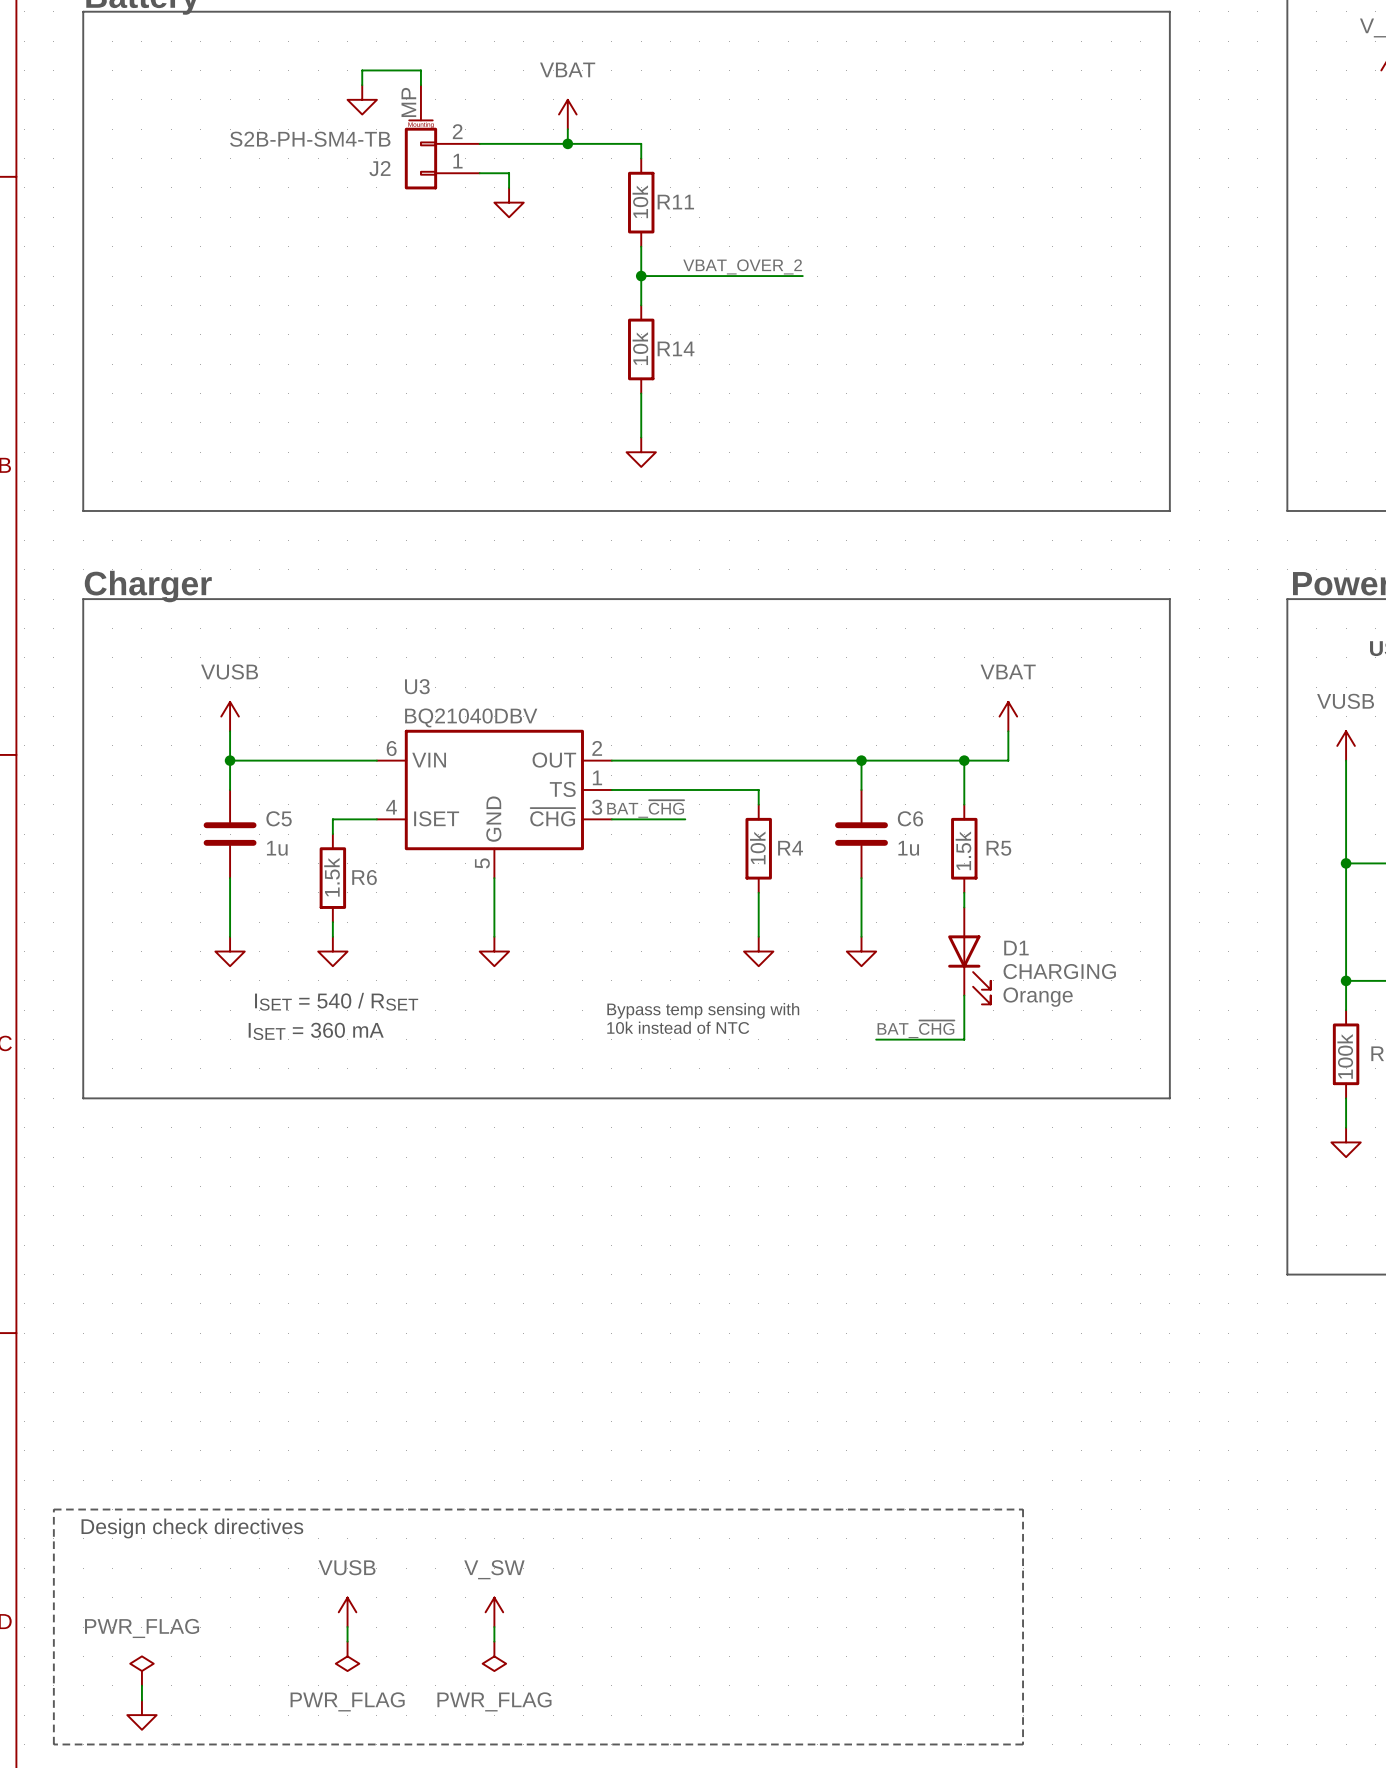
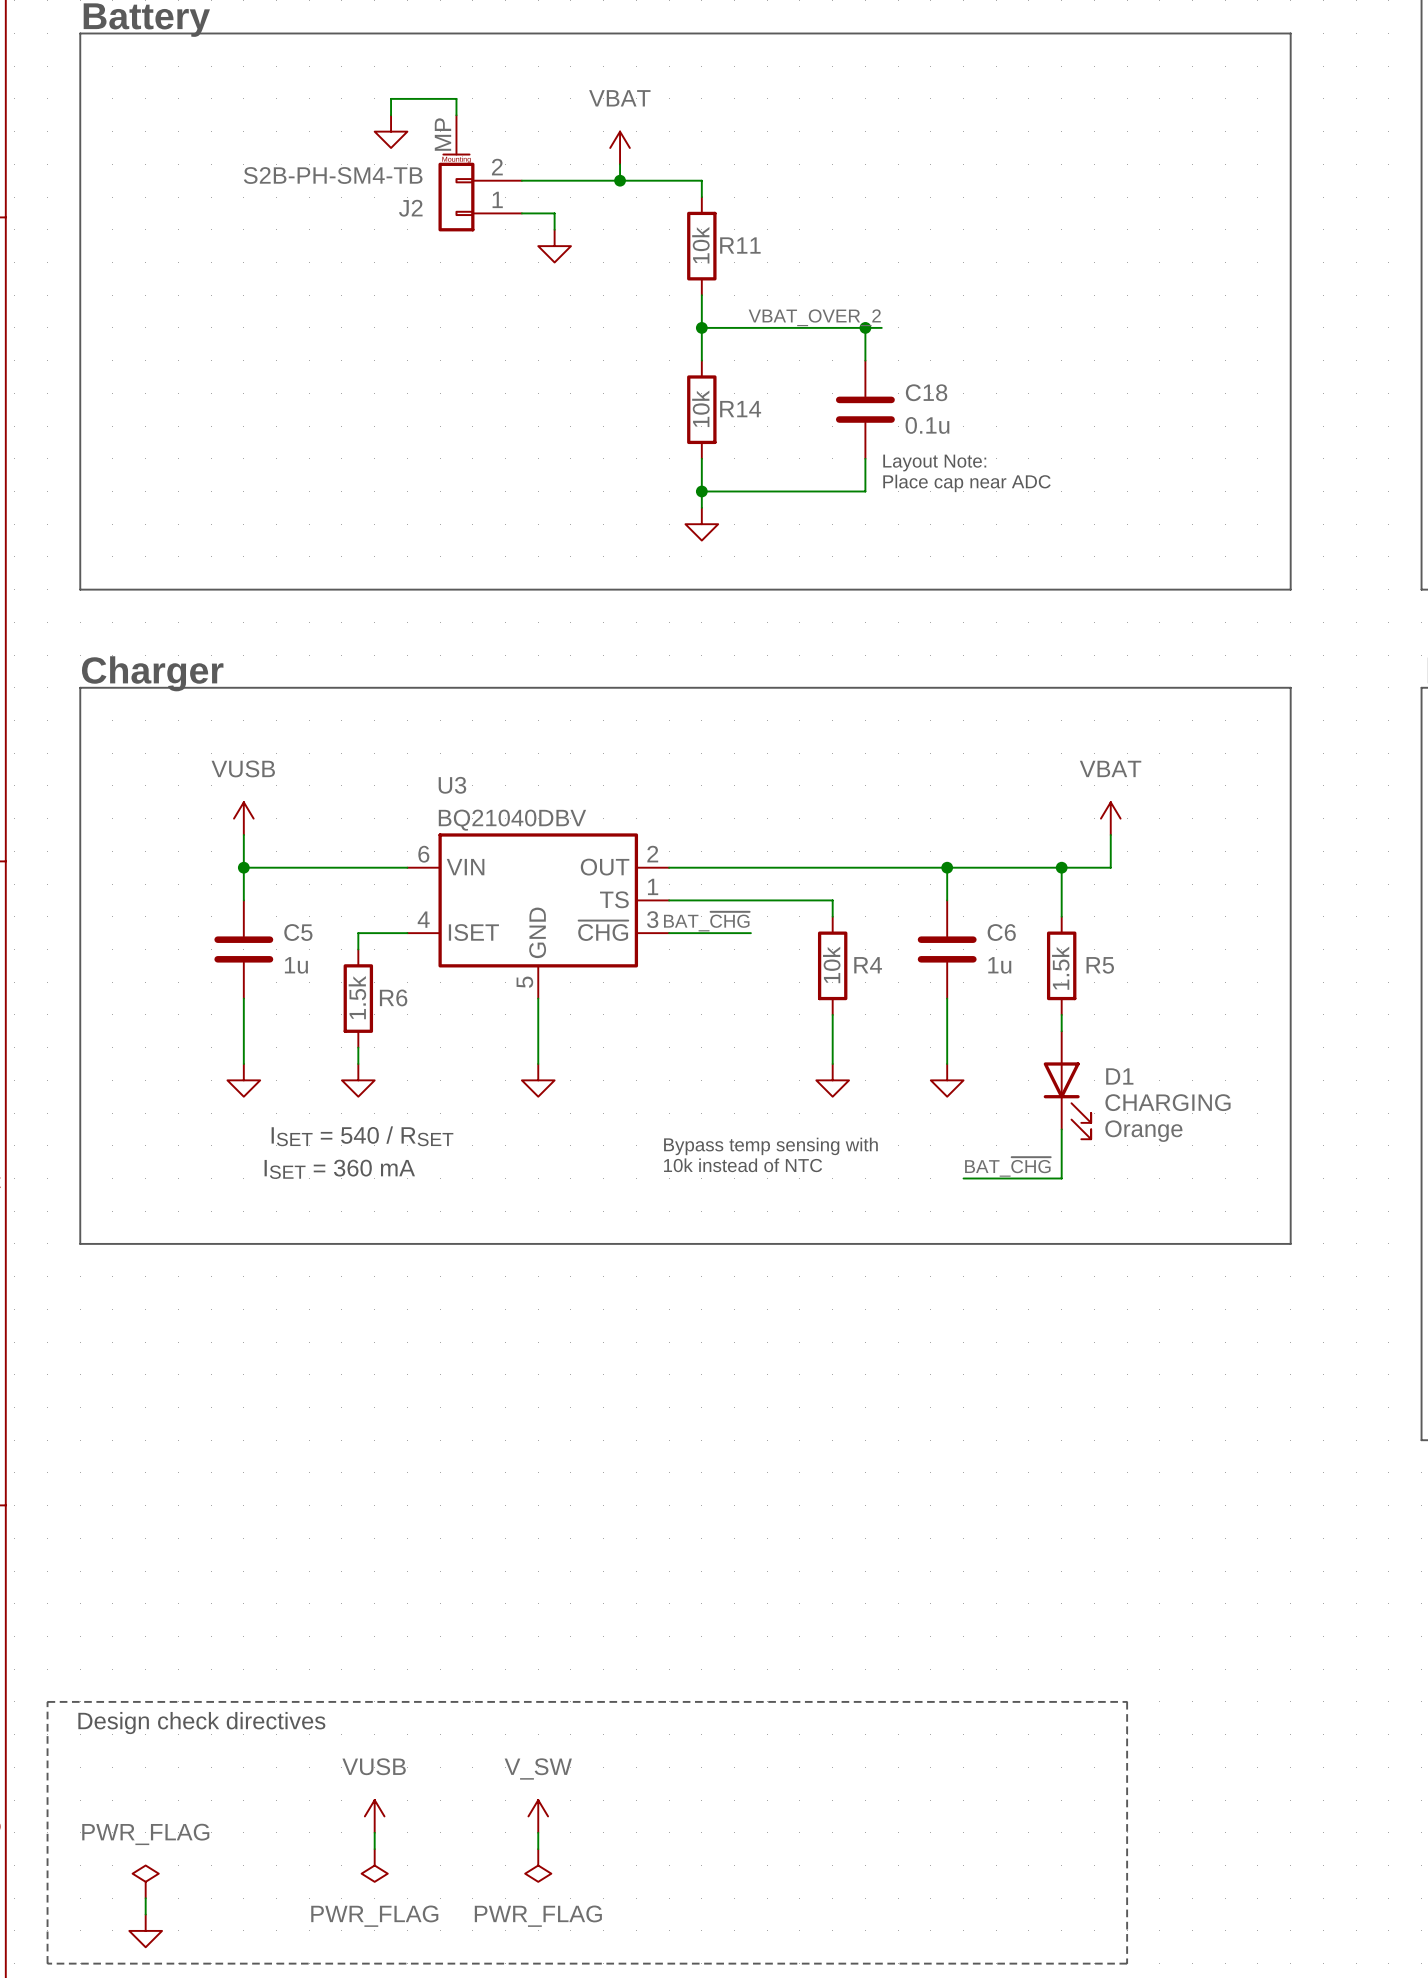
wire: none -> (865, 327) (865, 360)
junction: none -> (865, 327)
C18: none -> 0.1u (865, 409)
wire: none -> (865, 458) (865, 491) (701, 491)
text: none -> Layout Note: (934, 463)
text: none -> Place cap near ADC (966, 483)
junction: none -> (701, 491)

